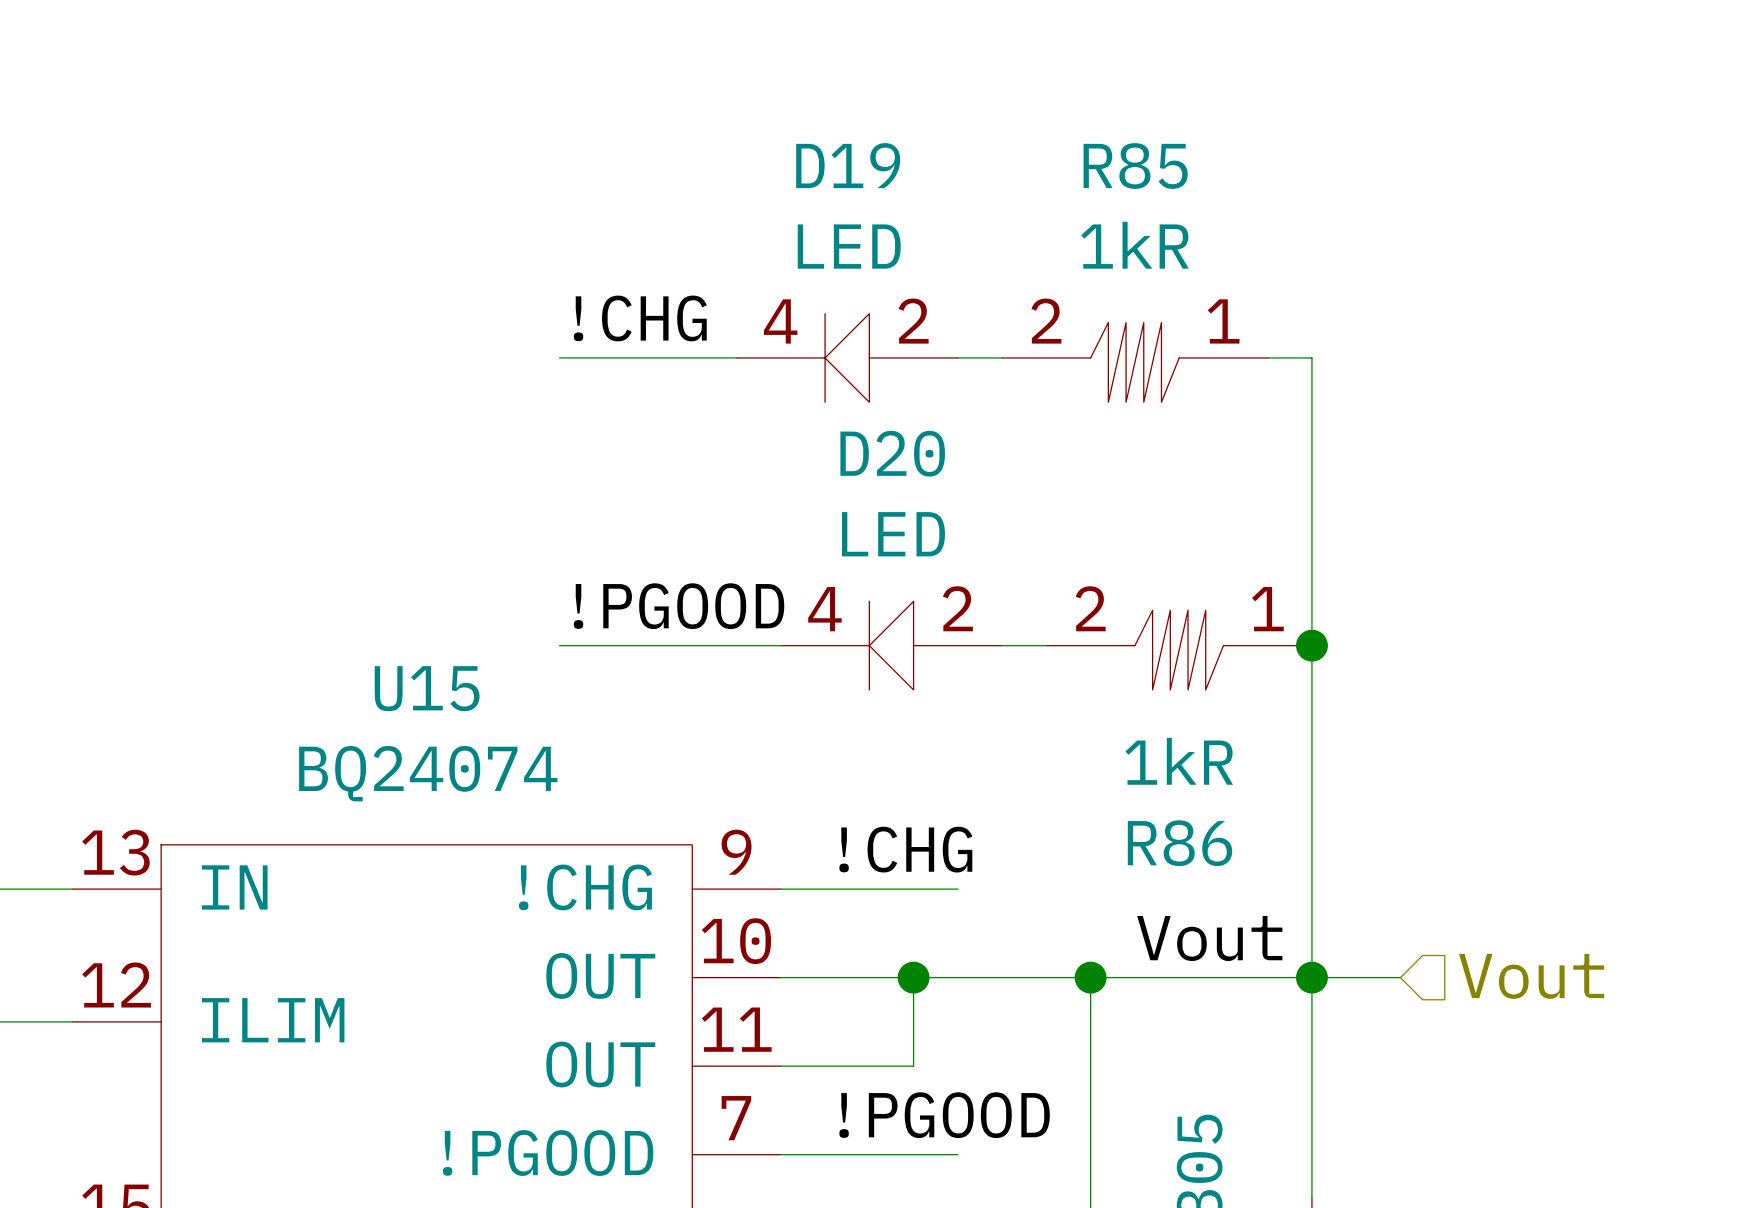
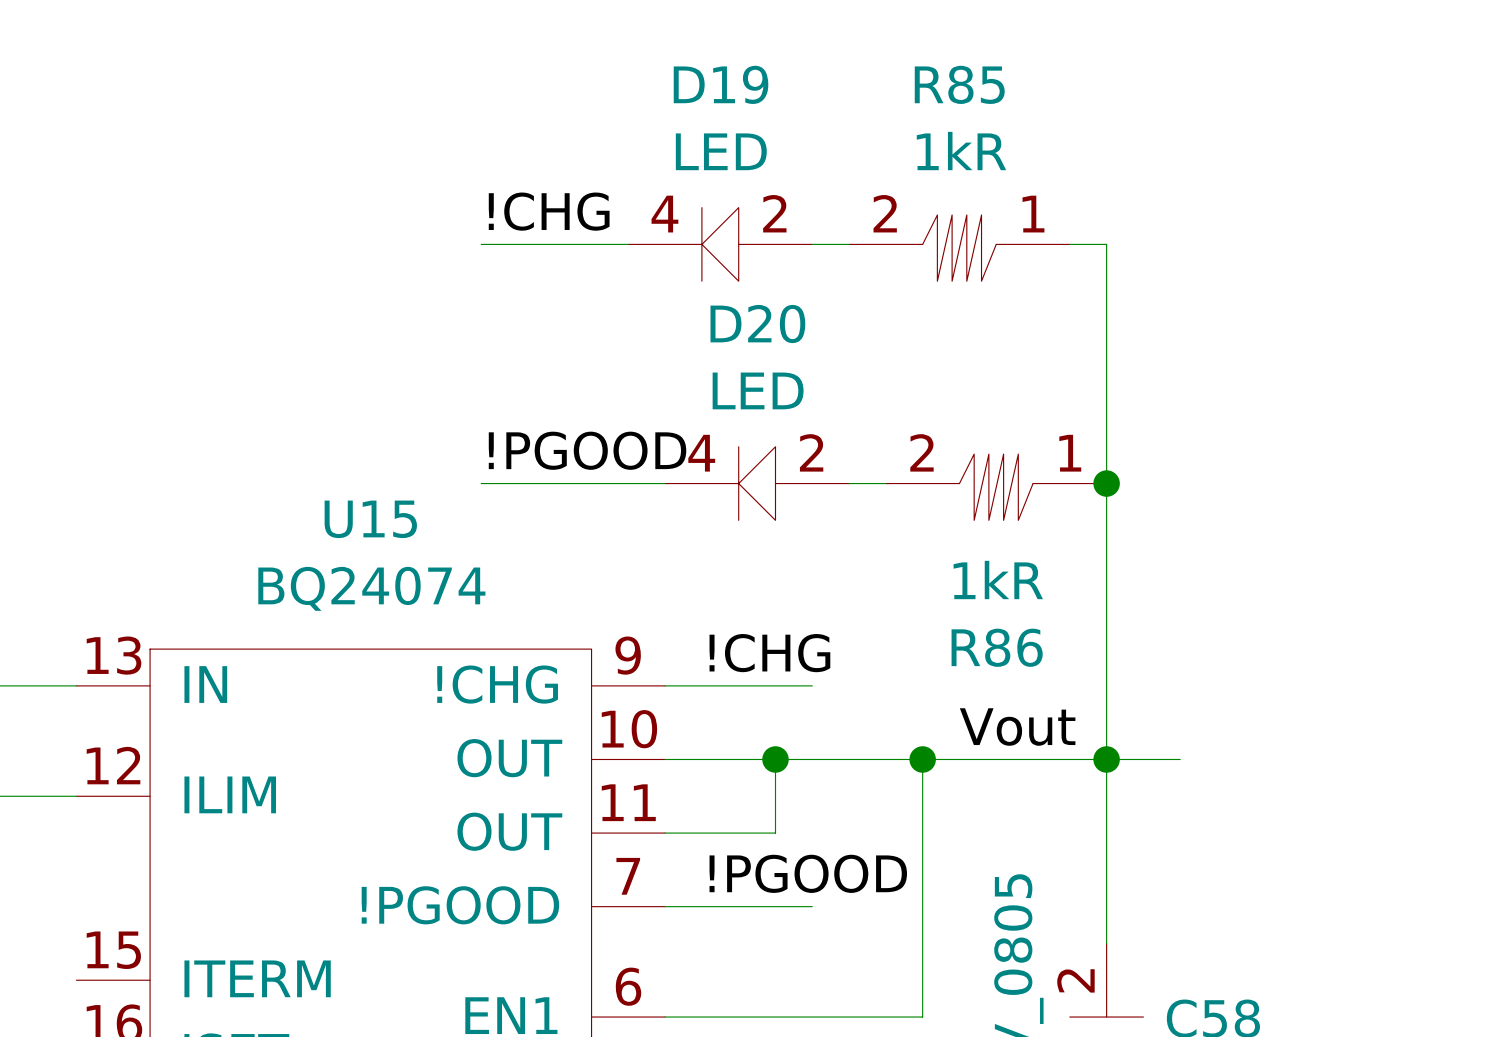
hierarchical label: Vout (1531, 976) -> none

